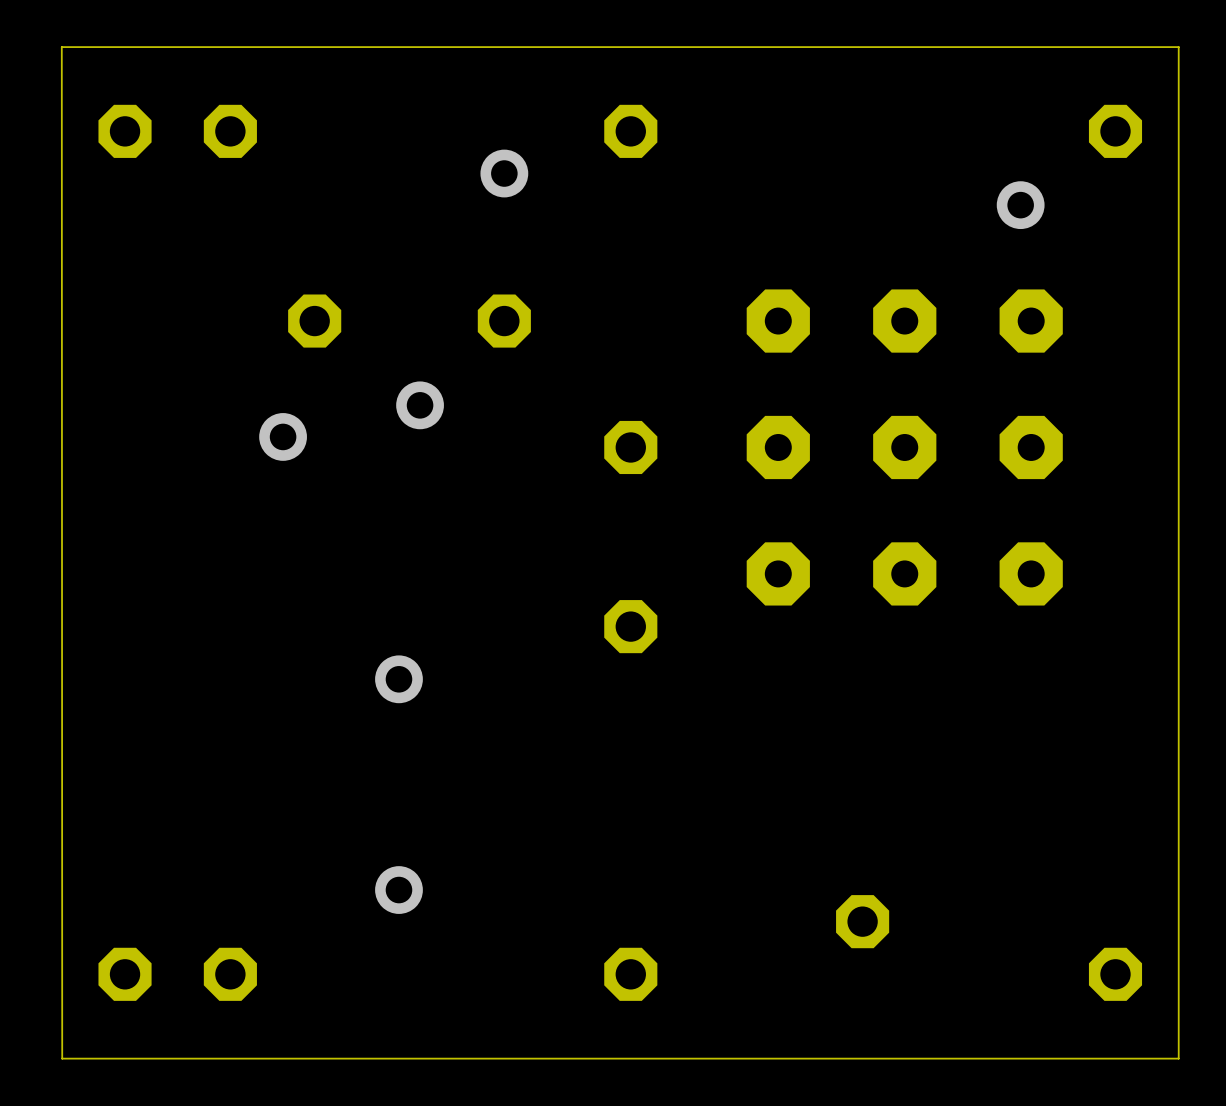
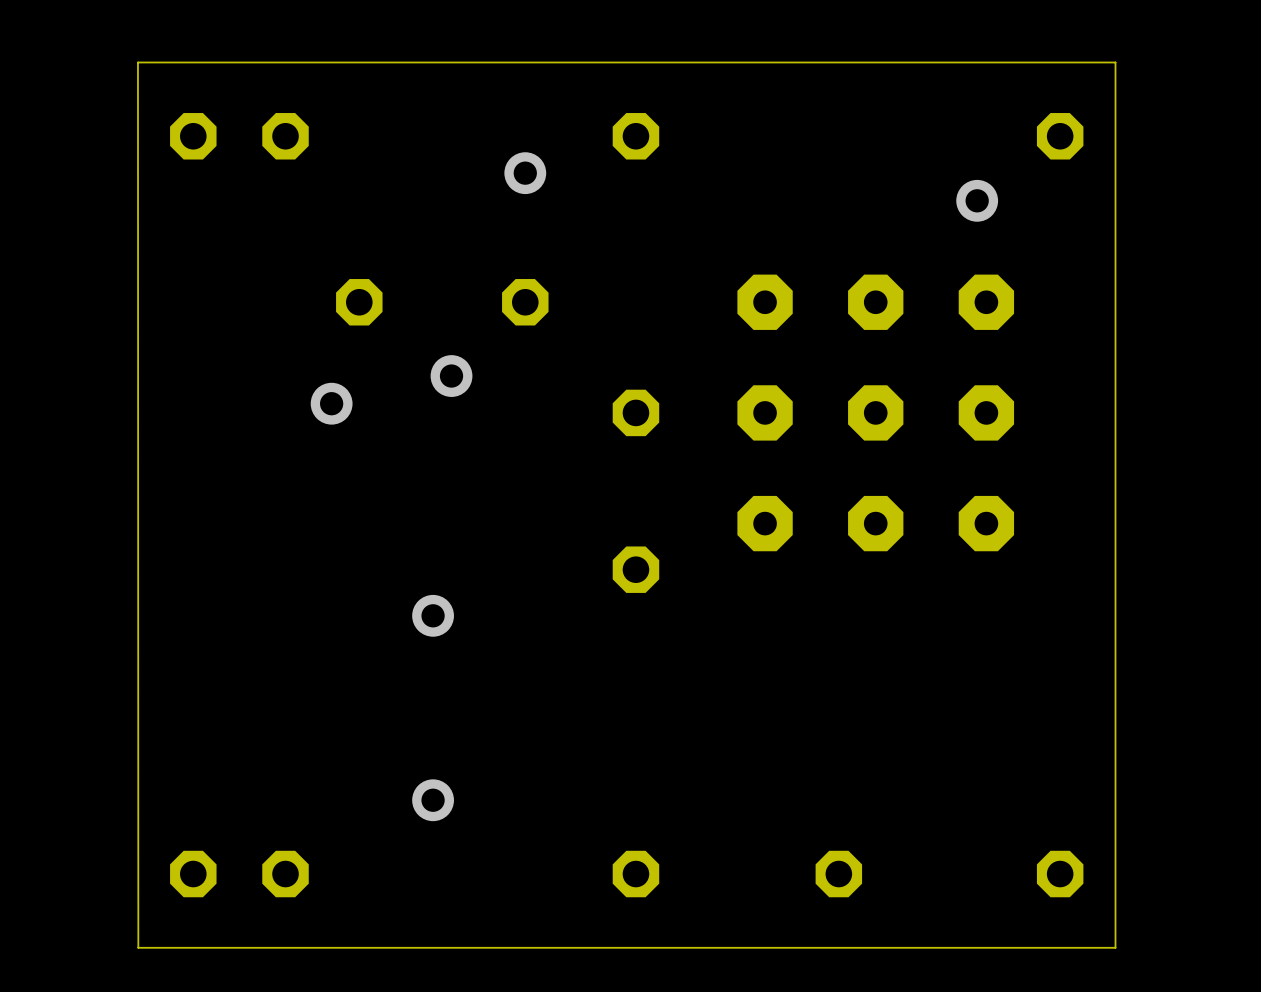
part position: (862, 921) -> (838, 874)

